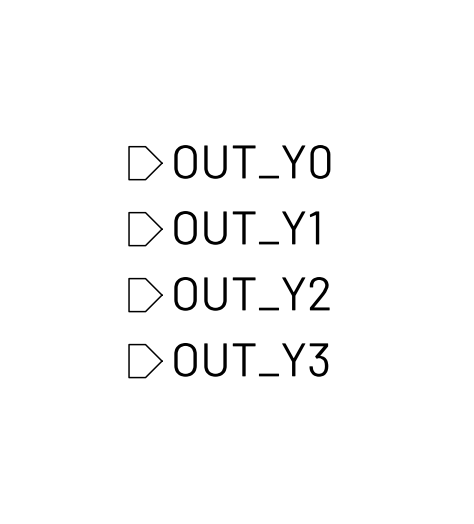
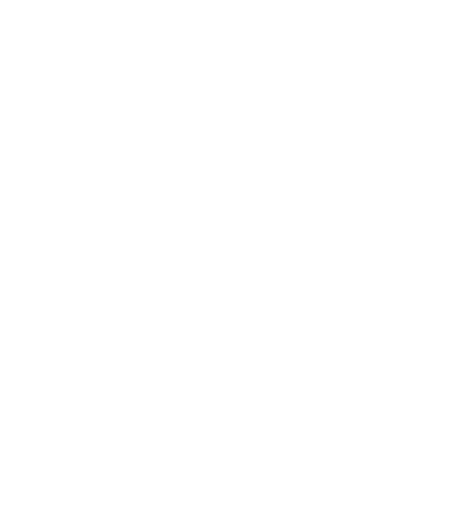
hierarchical label: OUT_Y0 (252, 161) -> none
hierarchical label: OUT_Y1 (246, 227) -> none
hierarchical label: OUT_Y2 (251, 293) -> none
hierarchical label: OUT_Y3 (251, 359) -> none

